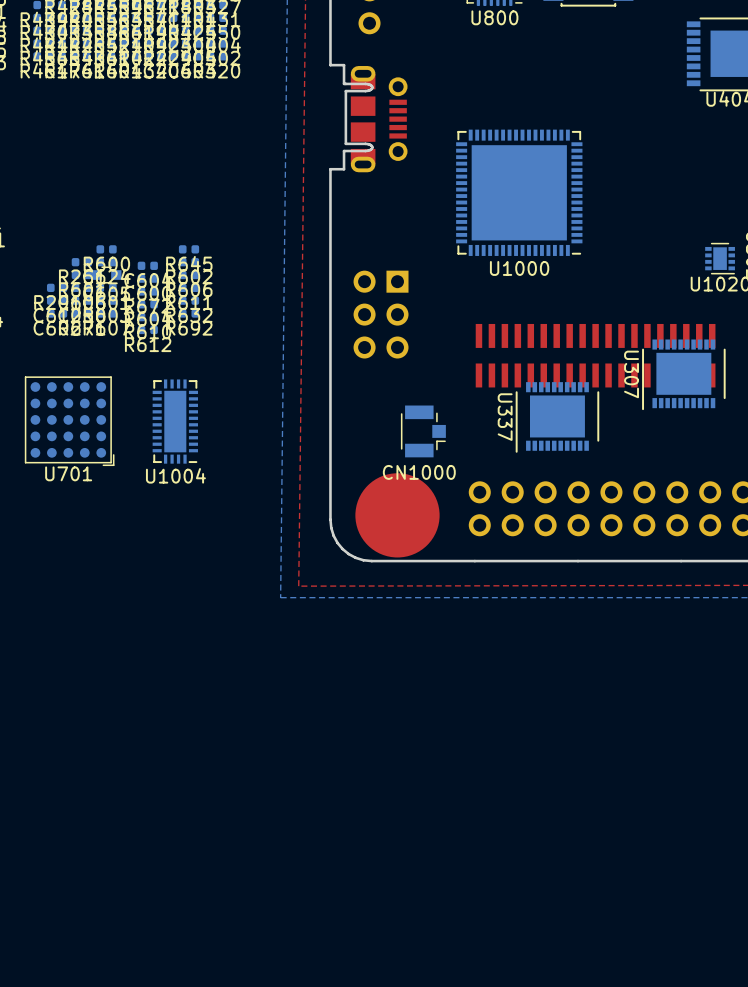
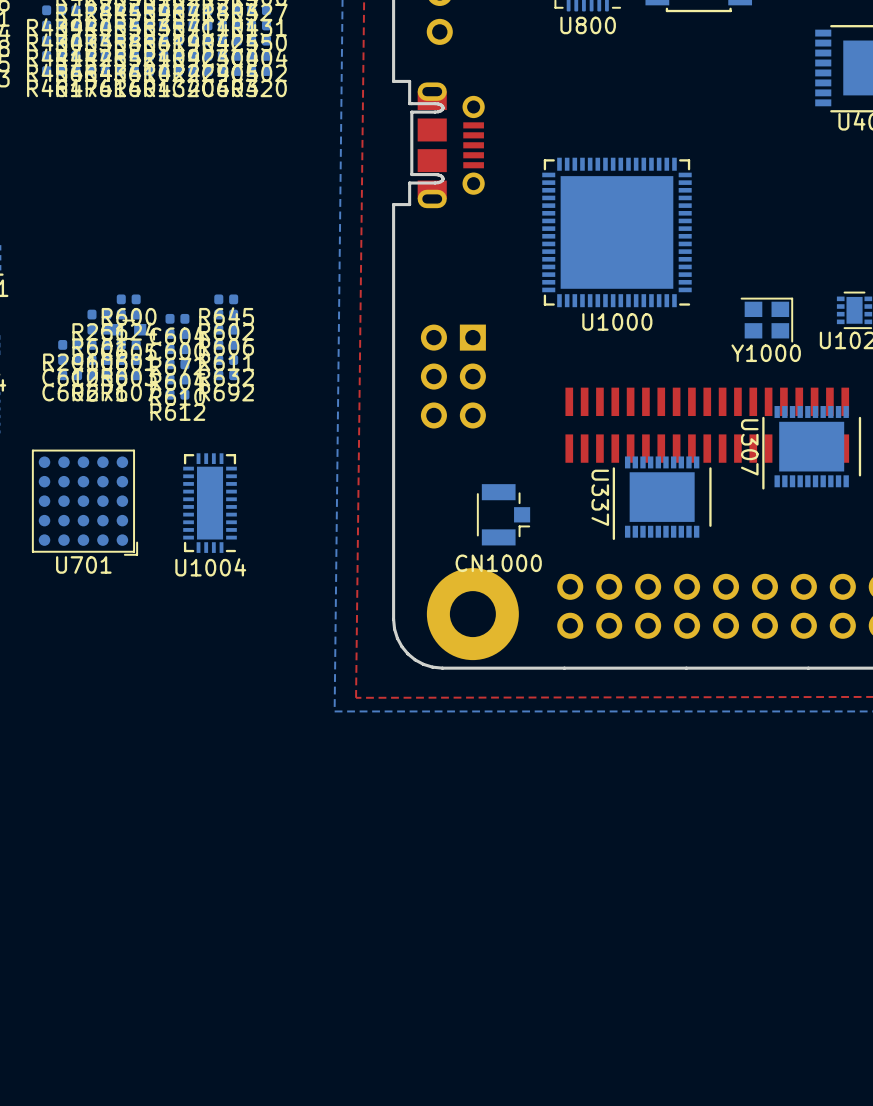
Y1000: none -> (766, 320)
part footprint: [355, 473, 440, 558] -> [426, 568, 519, 661]

